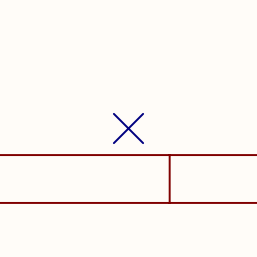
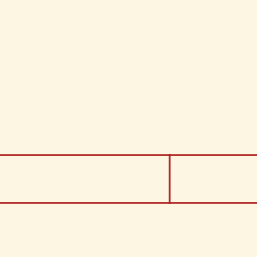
no-connect mark: (128, 128) -> none

